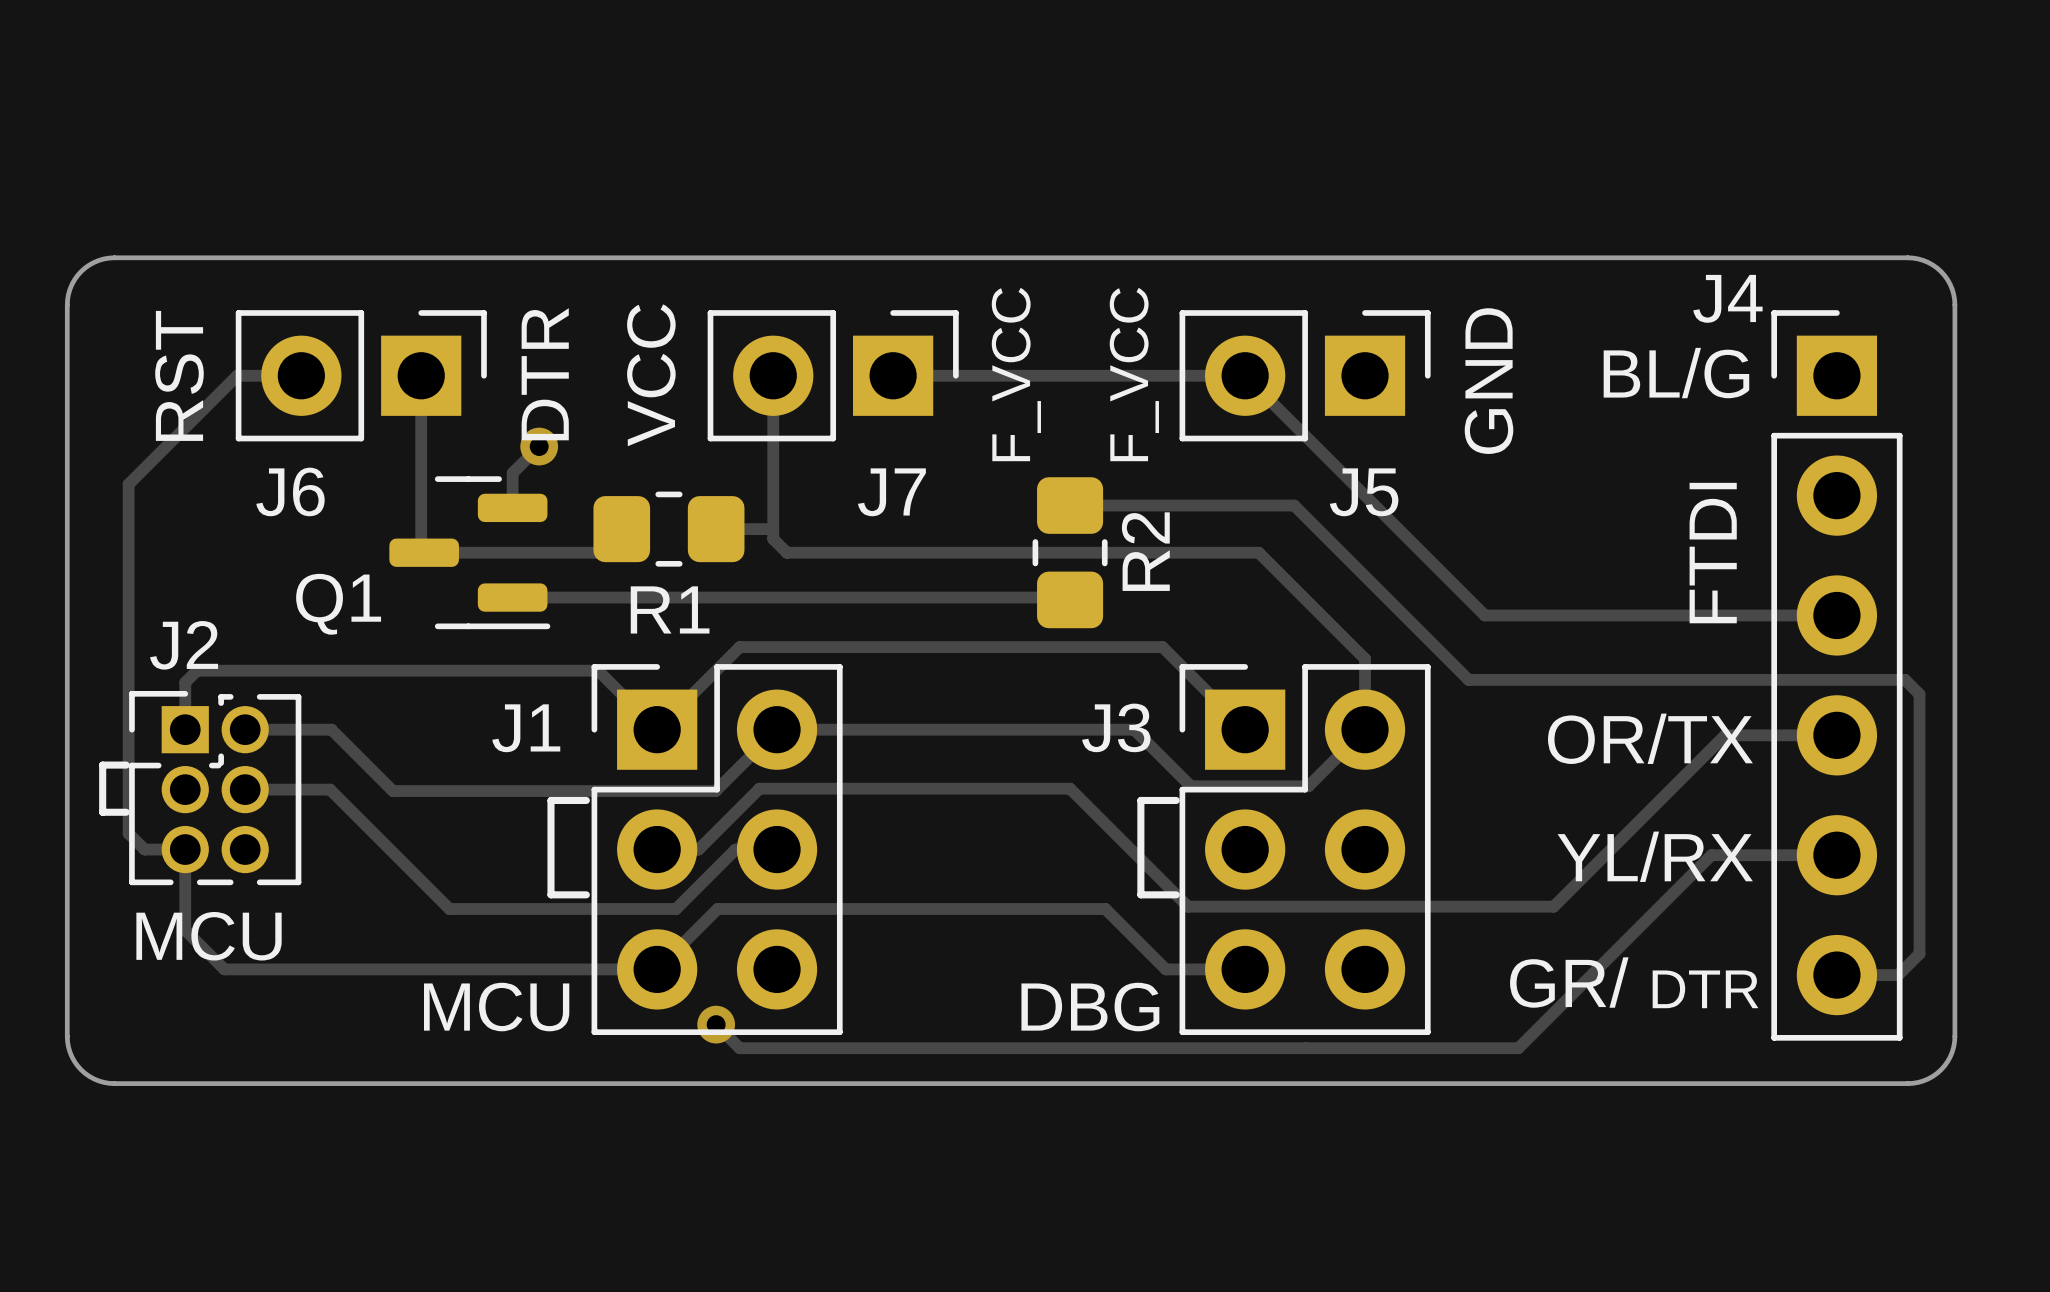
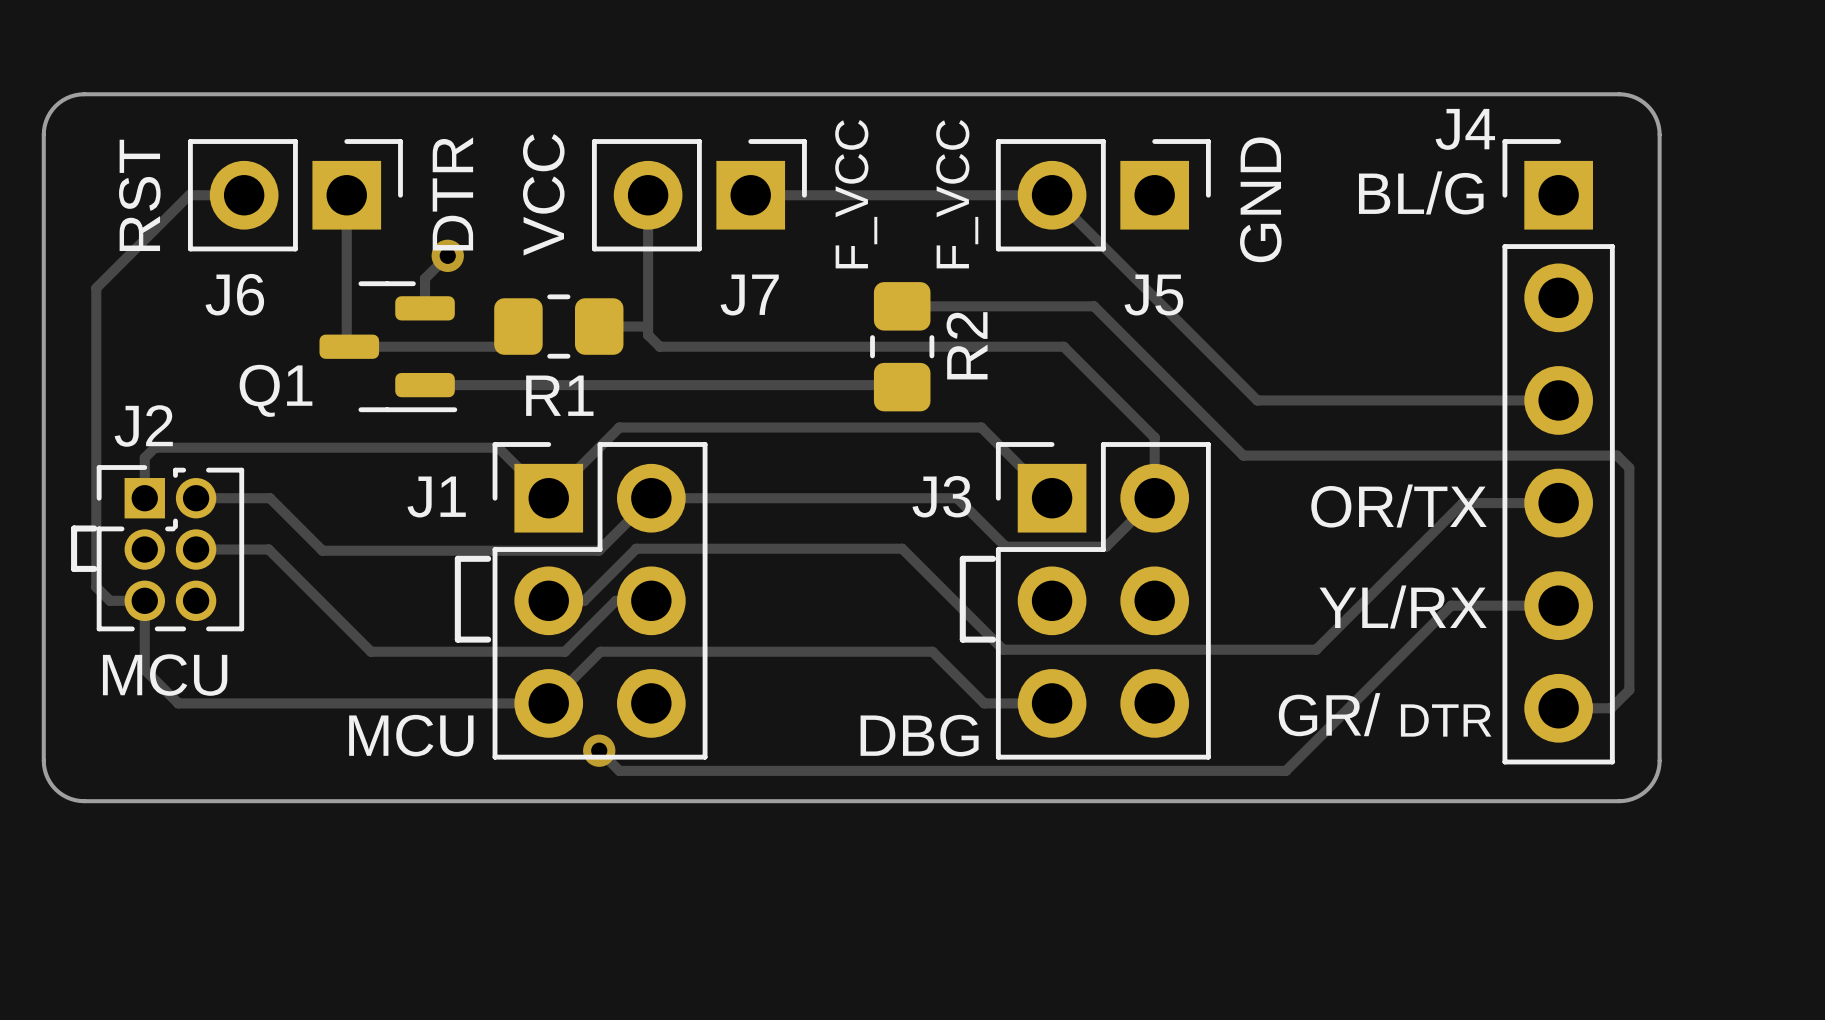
text: FTDI (1713, 553) -> none

